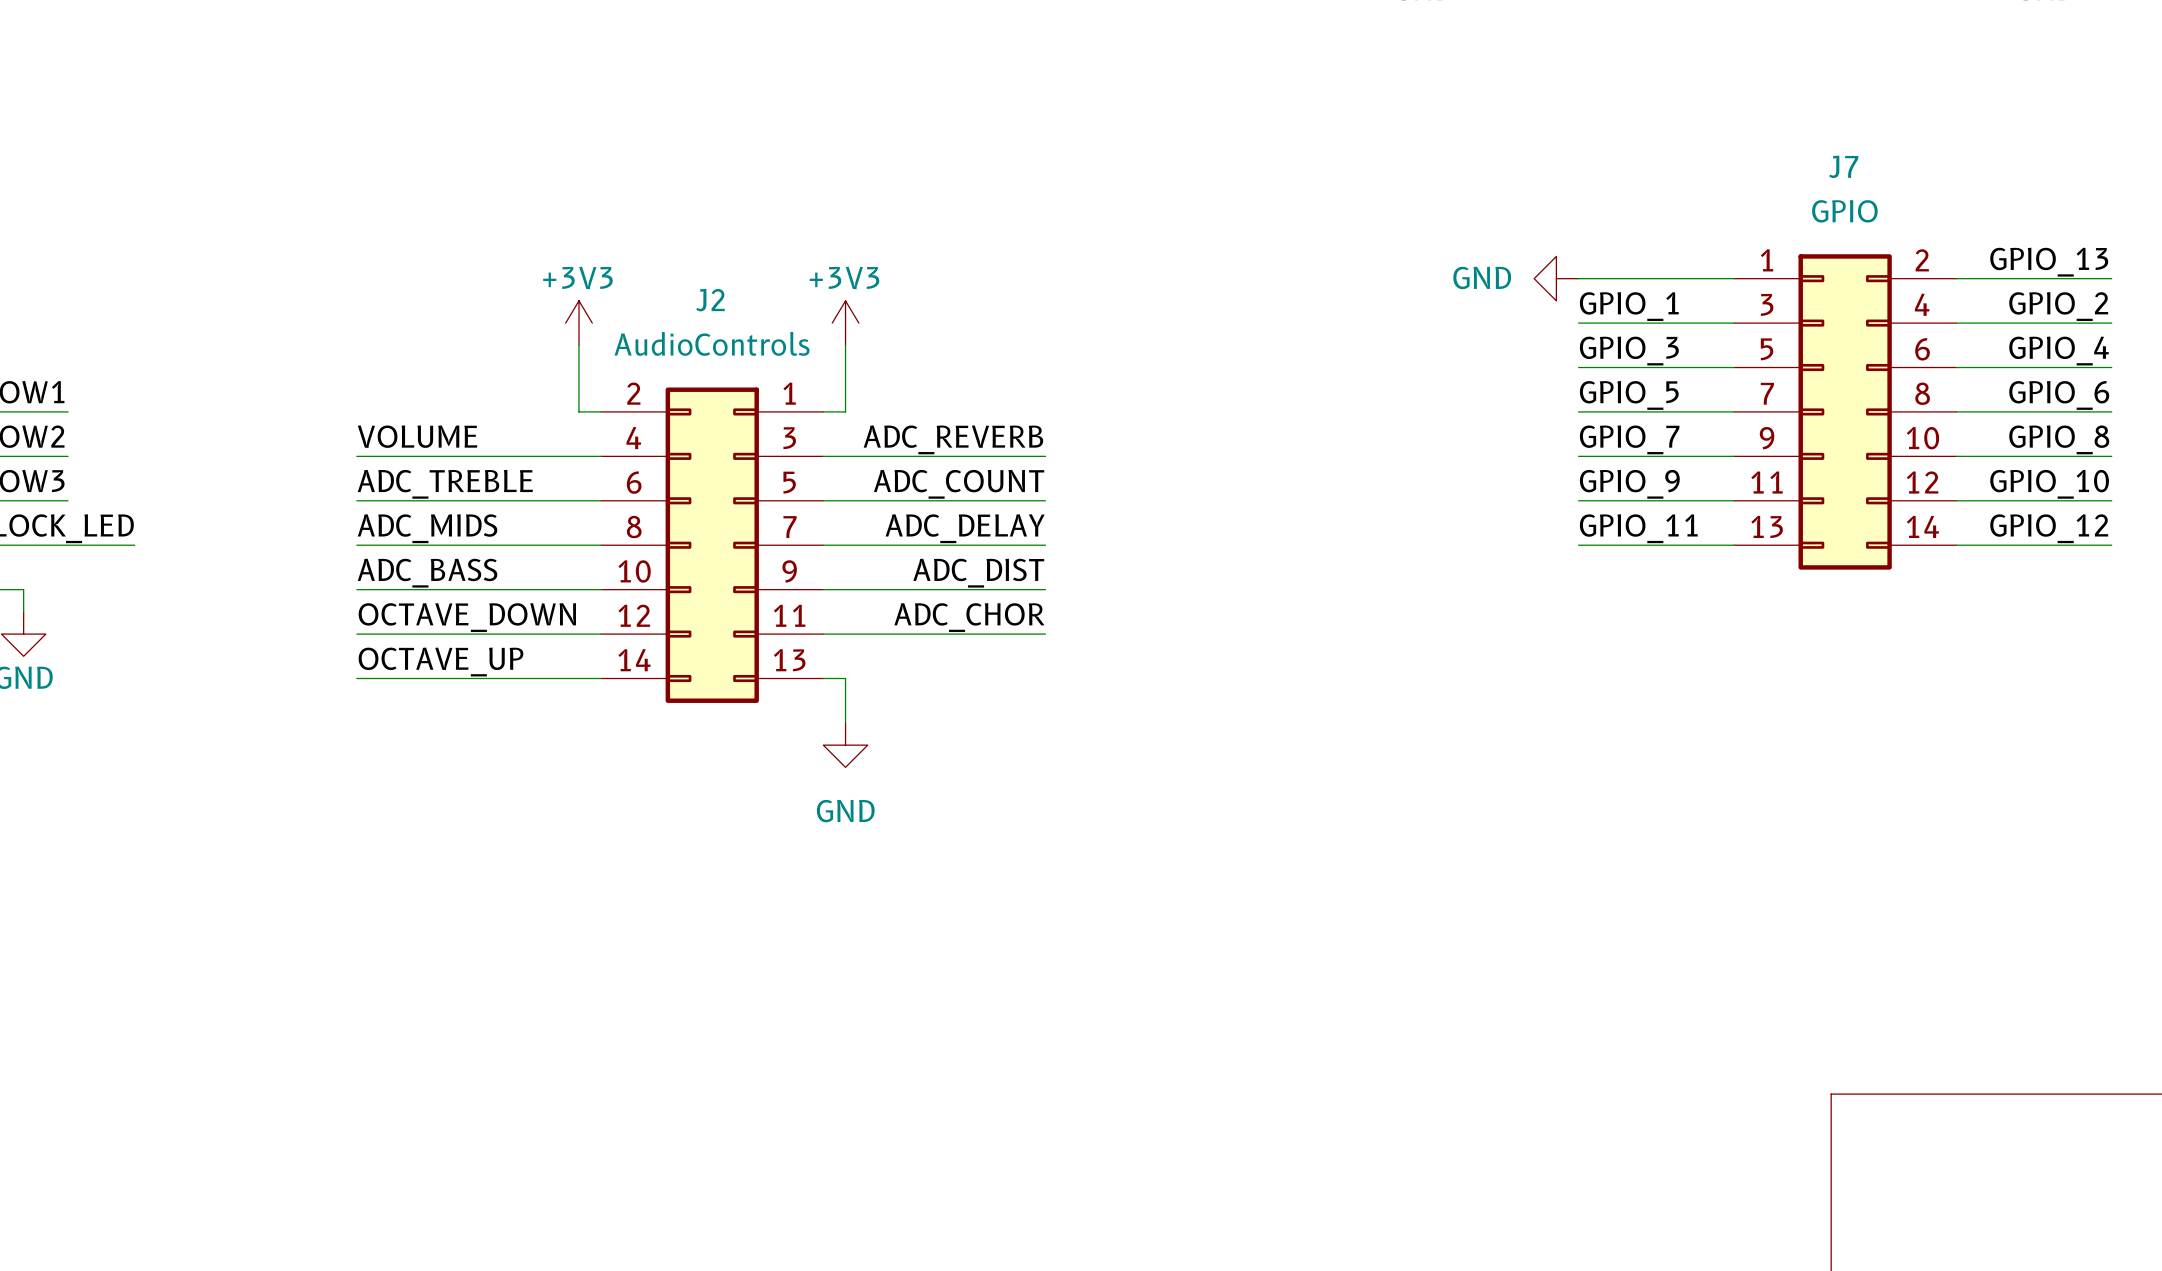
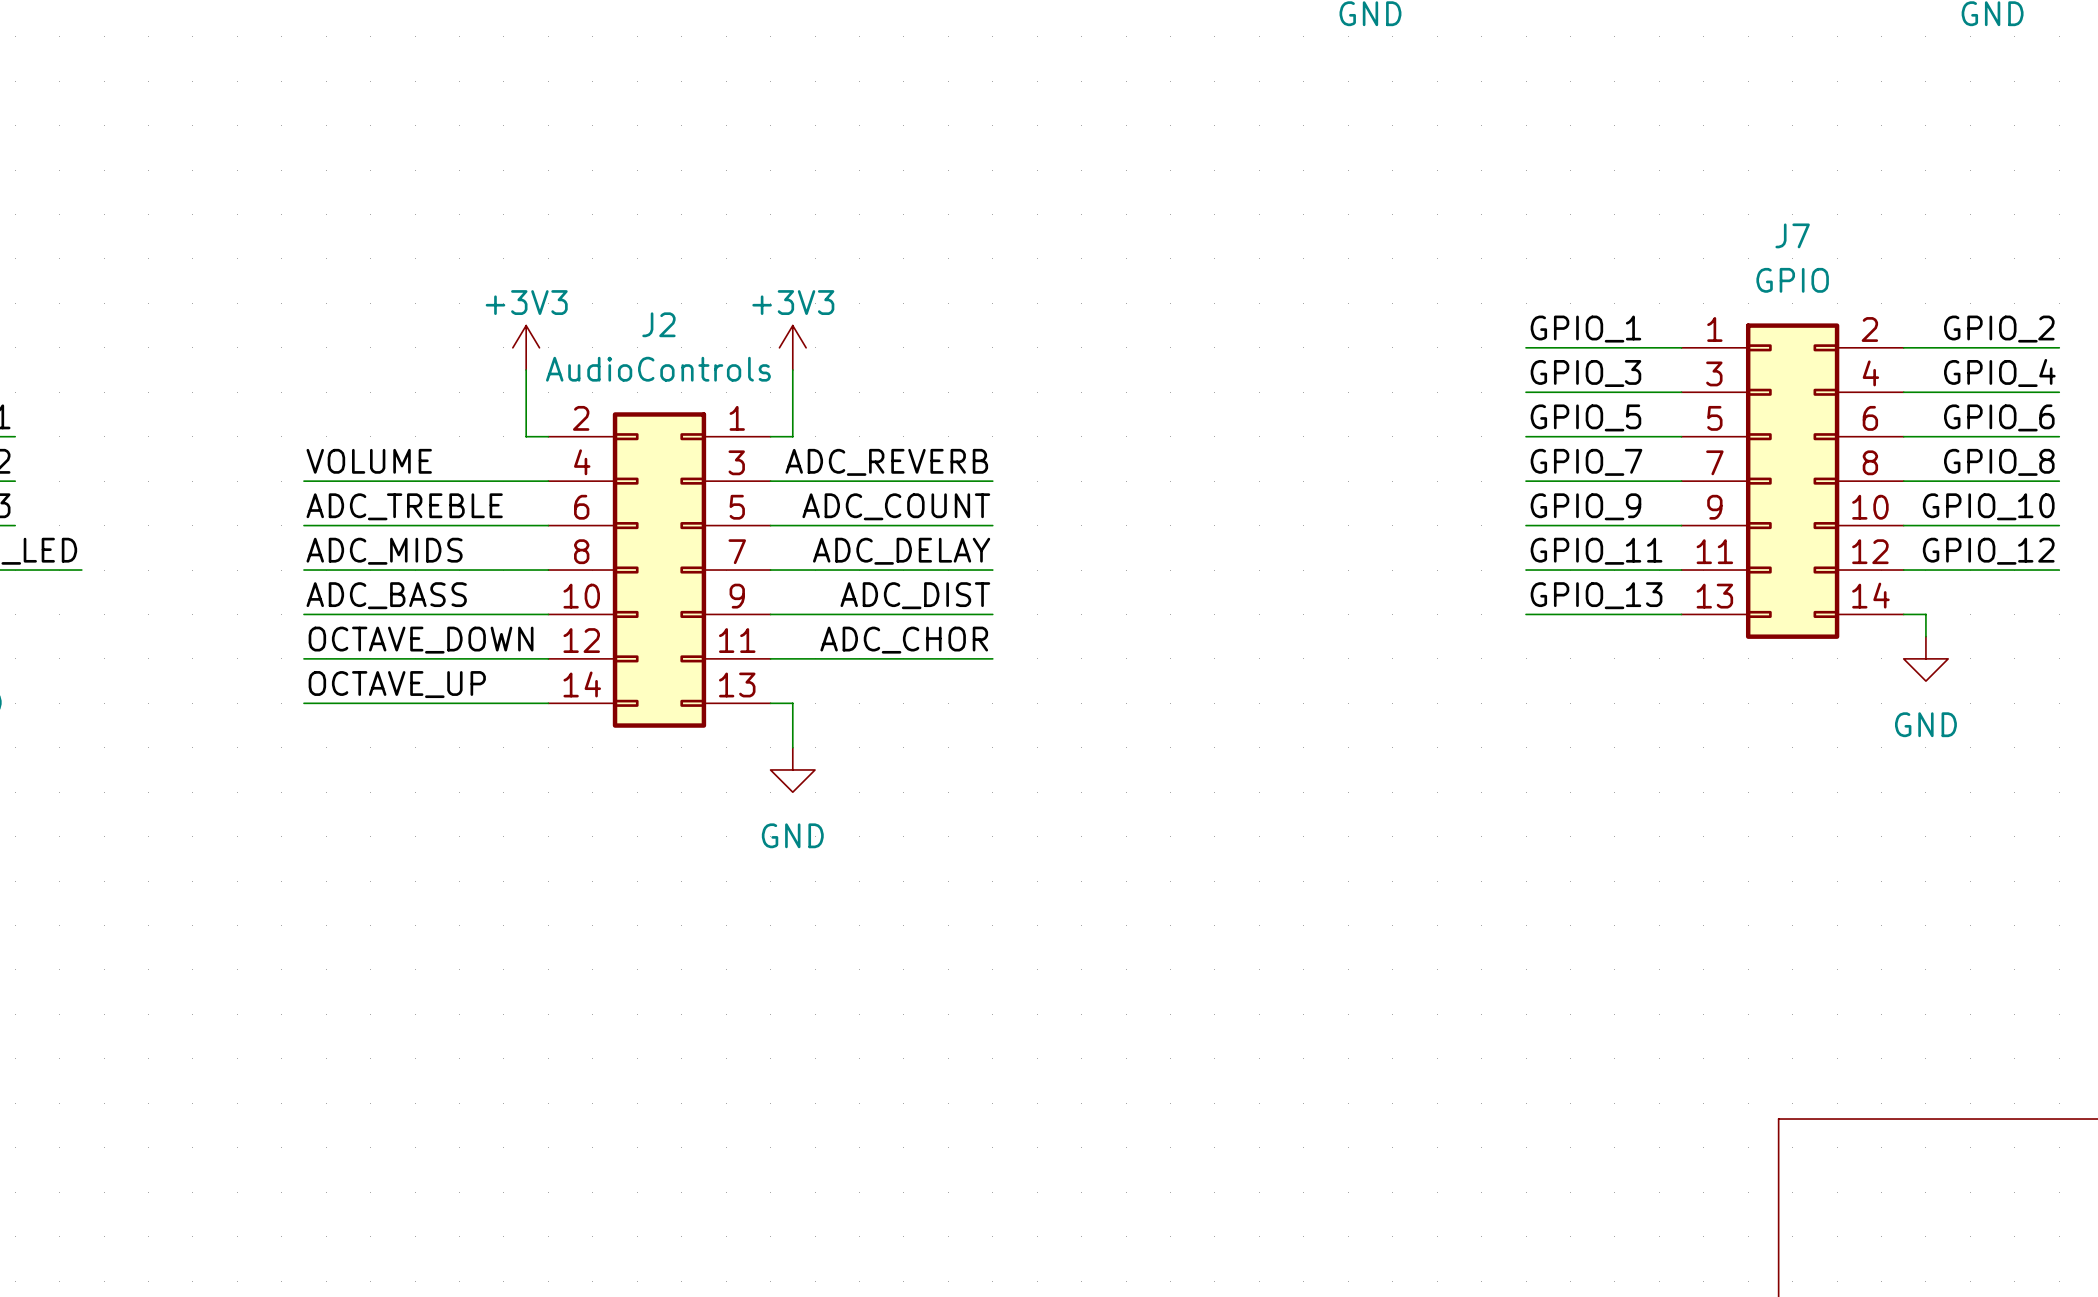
label: GPIO_13 (2049, 262) -> none
power symbol: GND (1556, 278) -> none
wire: (1578, 278) (1734, 278) -> (1526, 614) (1681, 614)
wire: (1956, 278) (2111, 278) -> none
J7 position: (1845, 411) -> (1792, 481)
label: none -> GPIO_13 (1596, 595)
wire: none -> (1903, 614) (1925, 614) (1925, 636)
power symbol: none -> GND (1925, 658)

